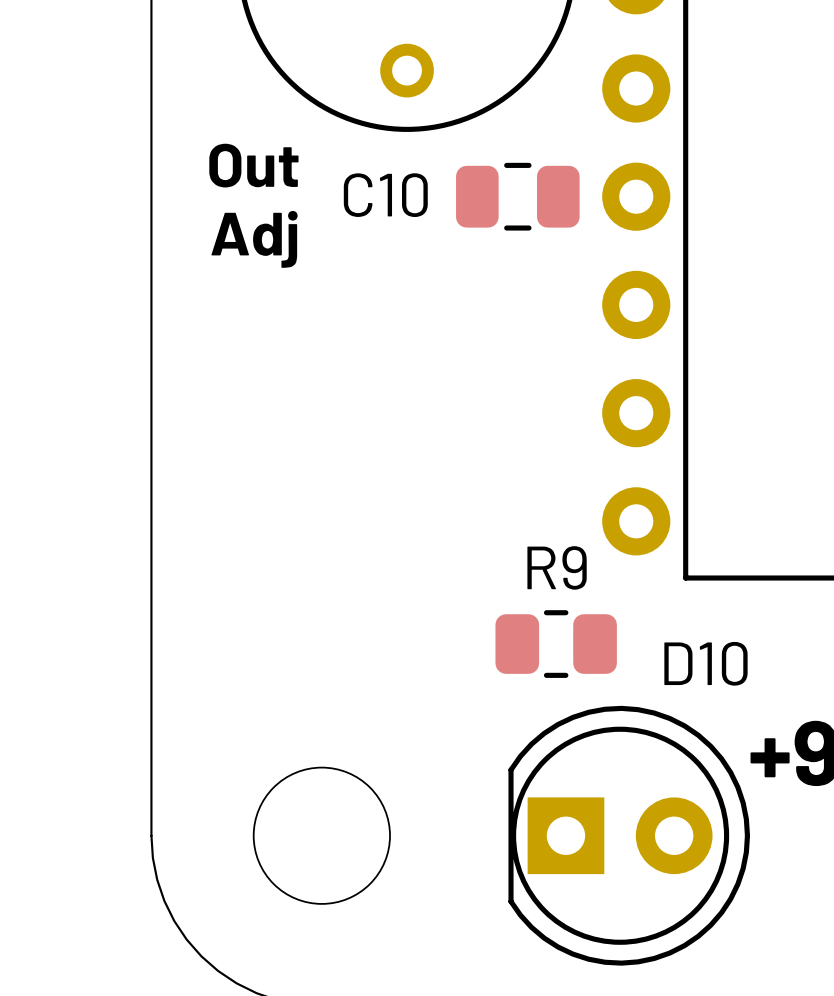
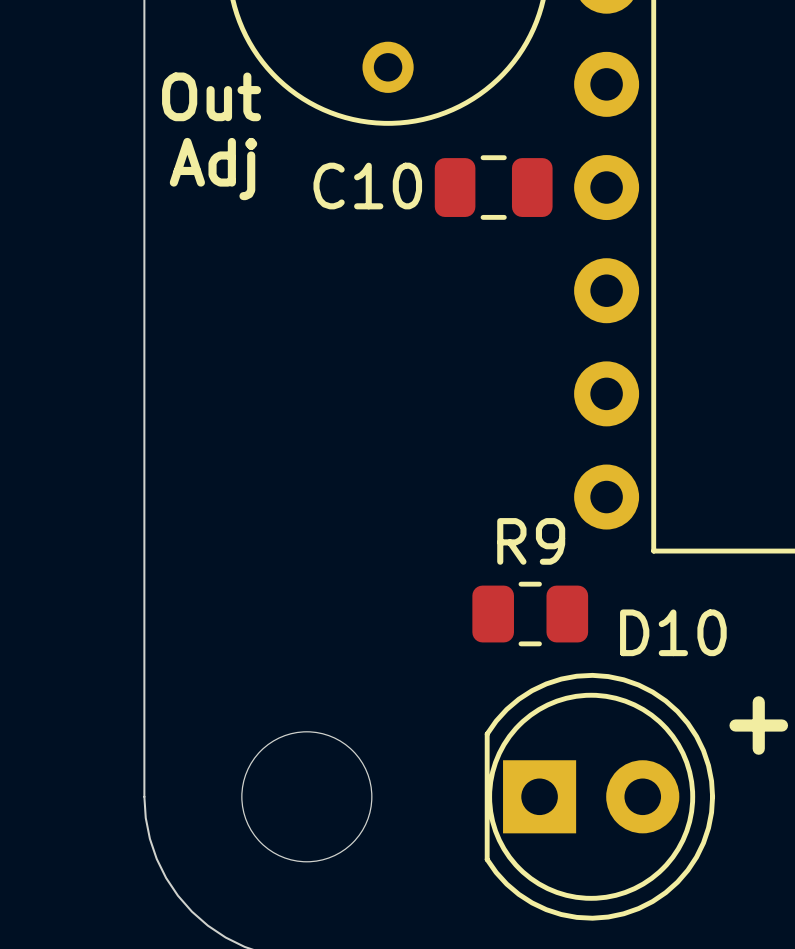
text: none -> Out (211, 96)
text: Out (253, 165) -> Adj (213, 169)
text: Adj (254, 239) -> none

